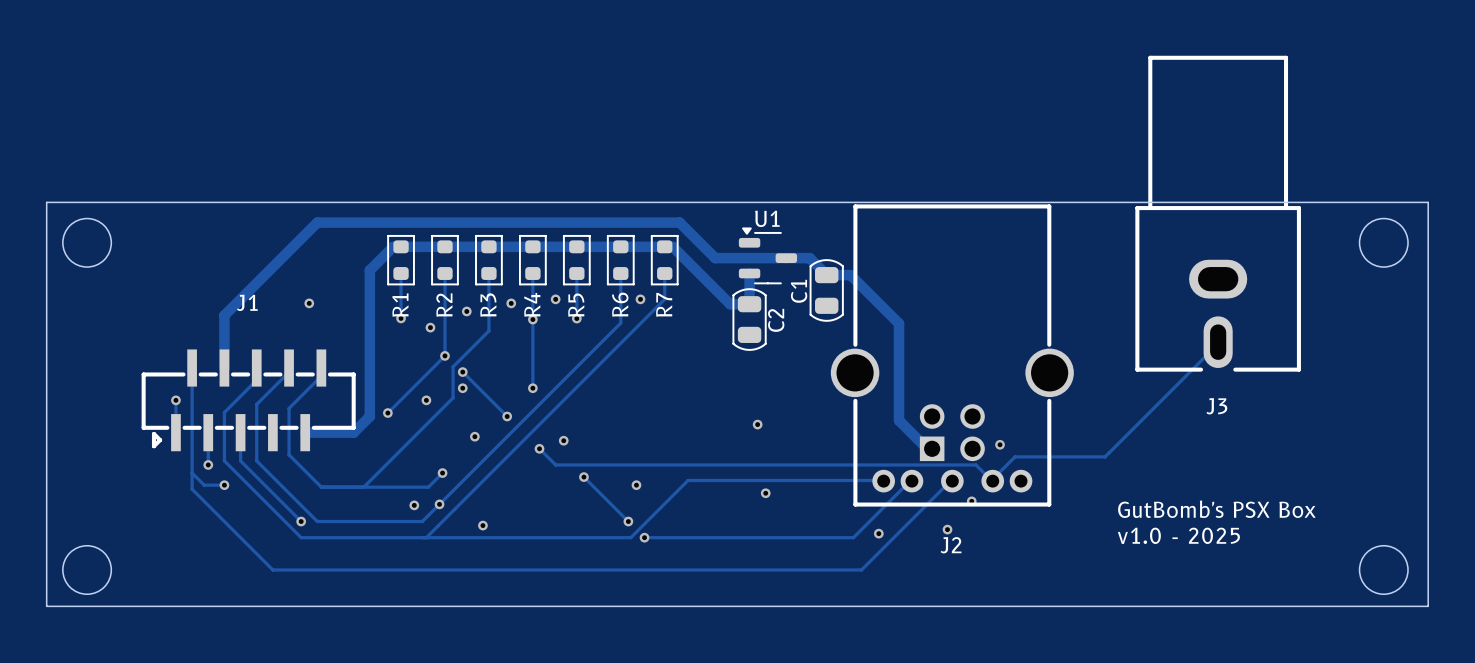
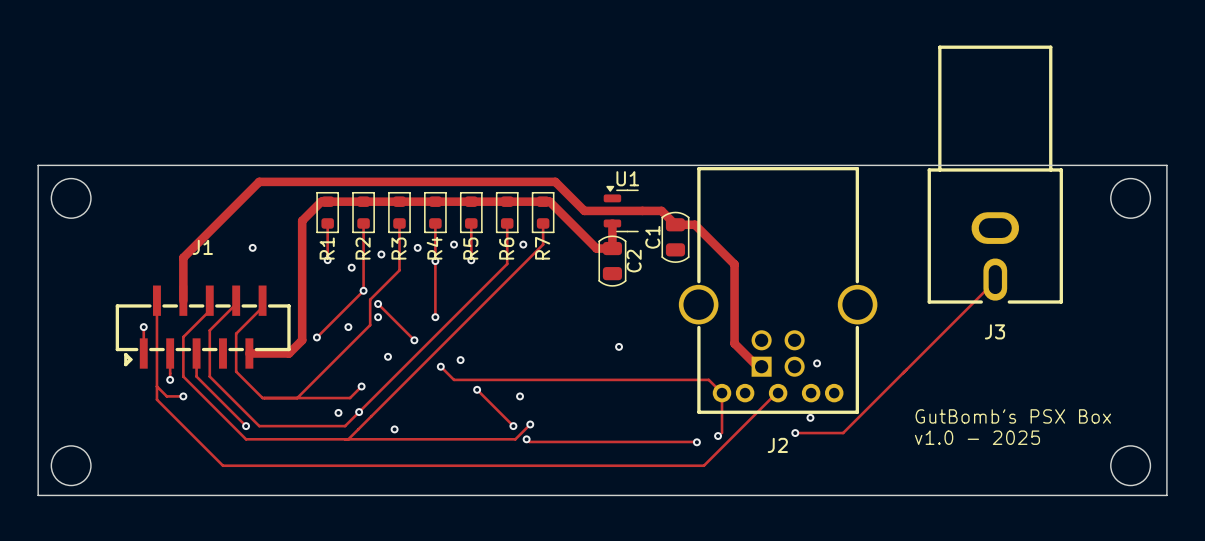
track: (1105, 456) (1015, 456) (991, 480) (975, 464) (867, 464) -> (902, 373) (843, 433) (795, 433)
track: none -> (708, 379) (722, 393) (722, 433)
track: (882, 480) (688, 480) (648, 519) -> none
track: (910, 480) (853, 537) (644, 537) -> (696, 442) (529, 441) (526, 439)
via: (765, 493) -> none
via: (971, 501) -> none
via: none -> (810, 417)
via: none -> (530, 424)
via: (947, 529) -> none
via: none -> (795, 433)
via: none -> (696, 442)

